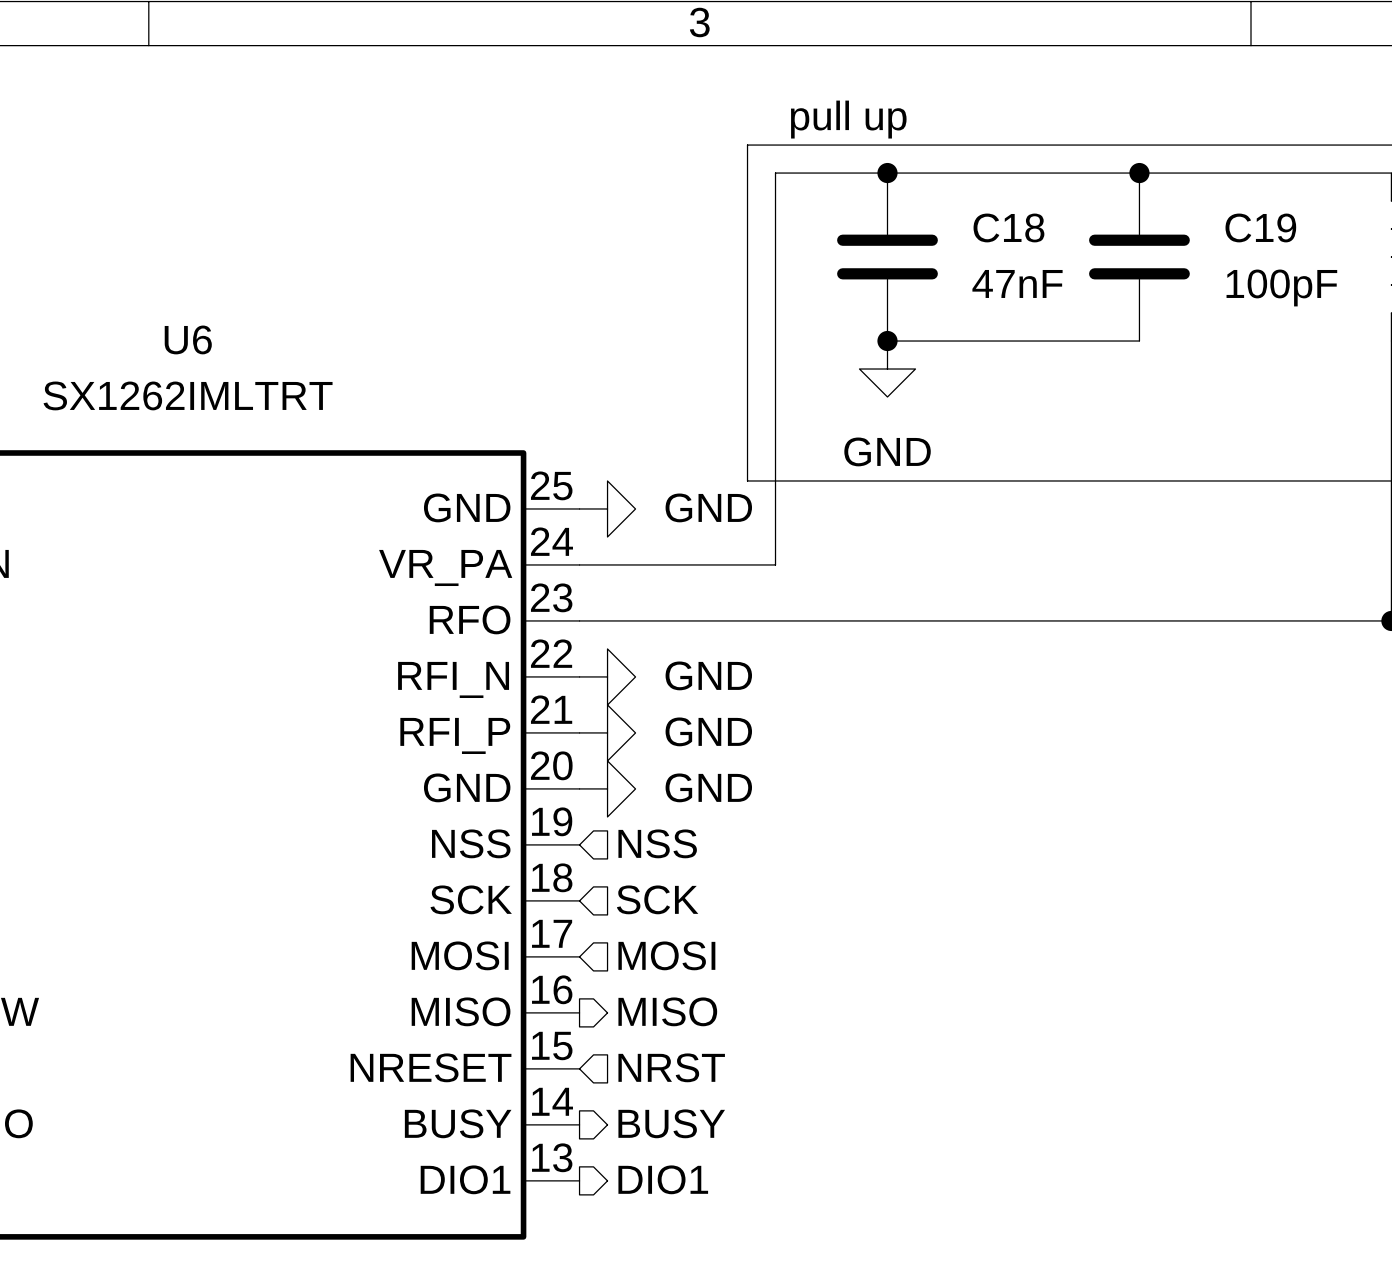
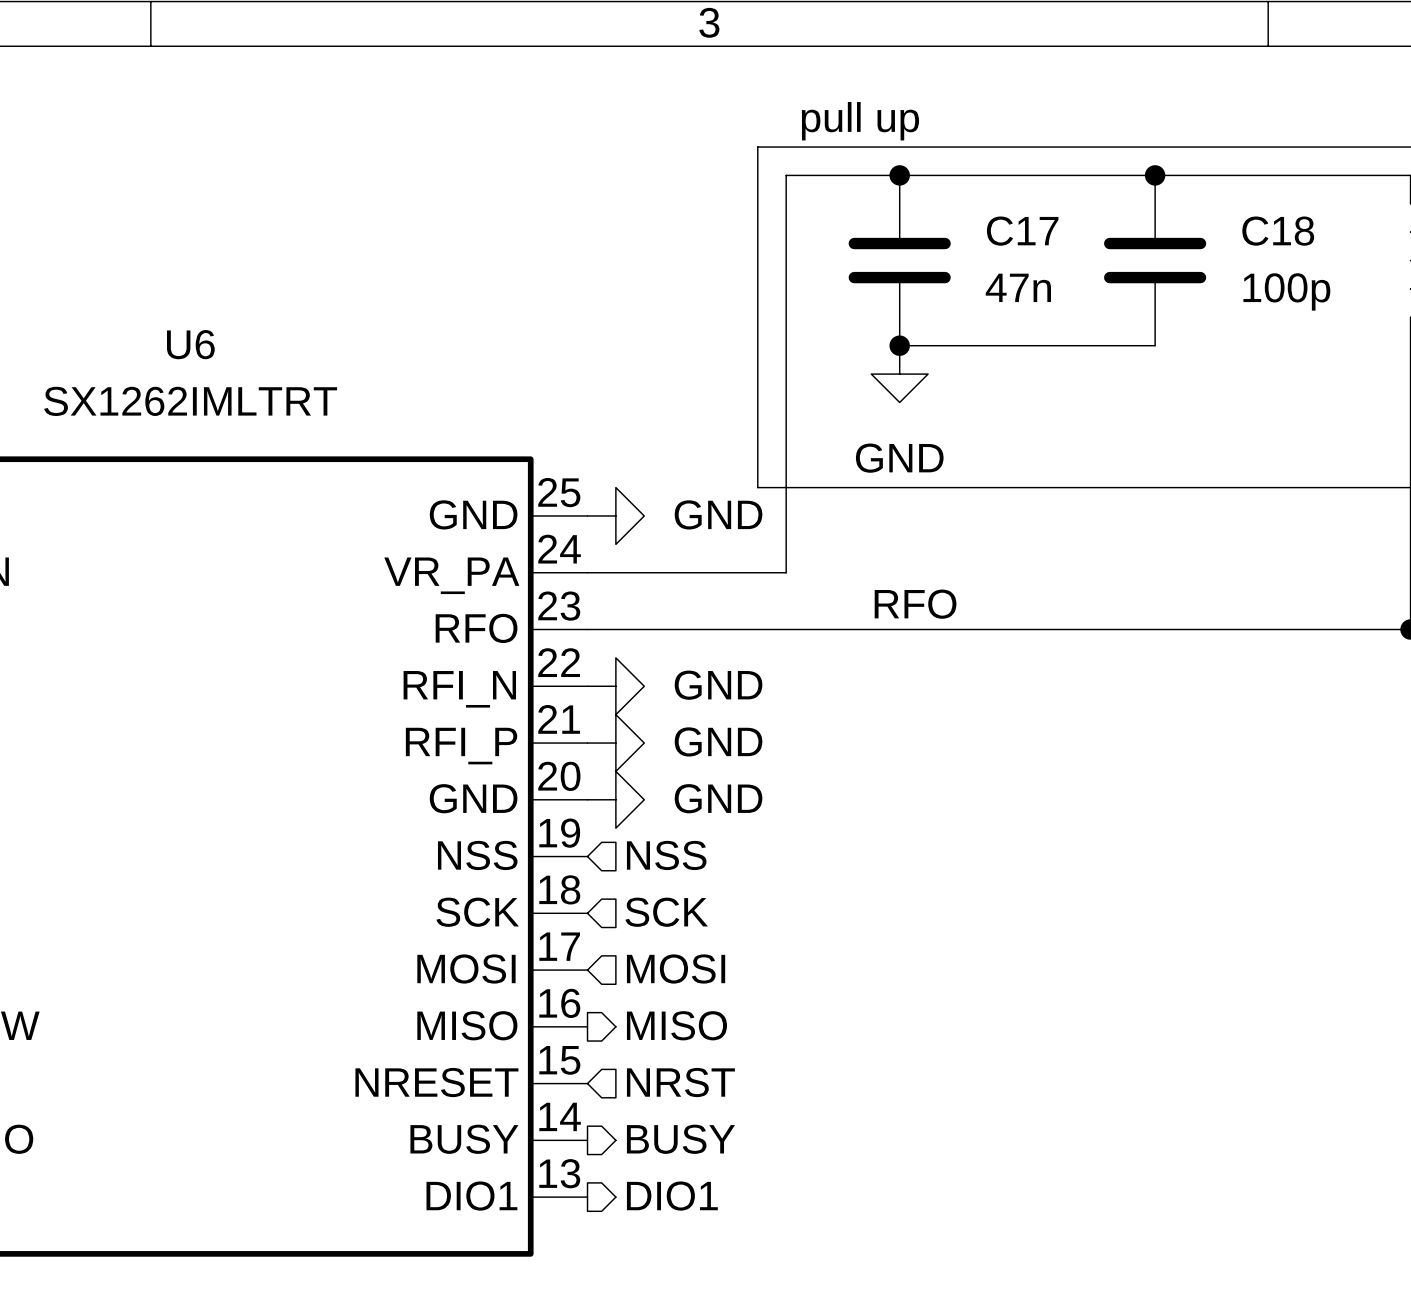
C18 name: C18 (1008, 227) -> C17 (1022, 231)
C19 name: C19 (1260, 227) -> C18 (1278, 231)
C18 value: 47nF (1017, 283) -> 47n (1018, 287)
C19 value: 100pF (1281, 287) -> 100p (1286, 291)
label: none -> RFO (915, 604)

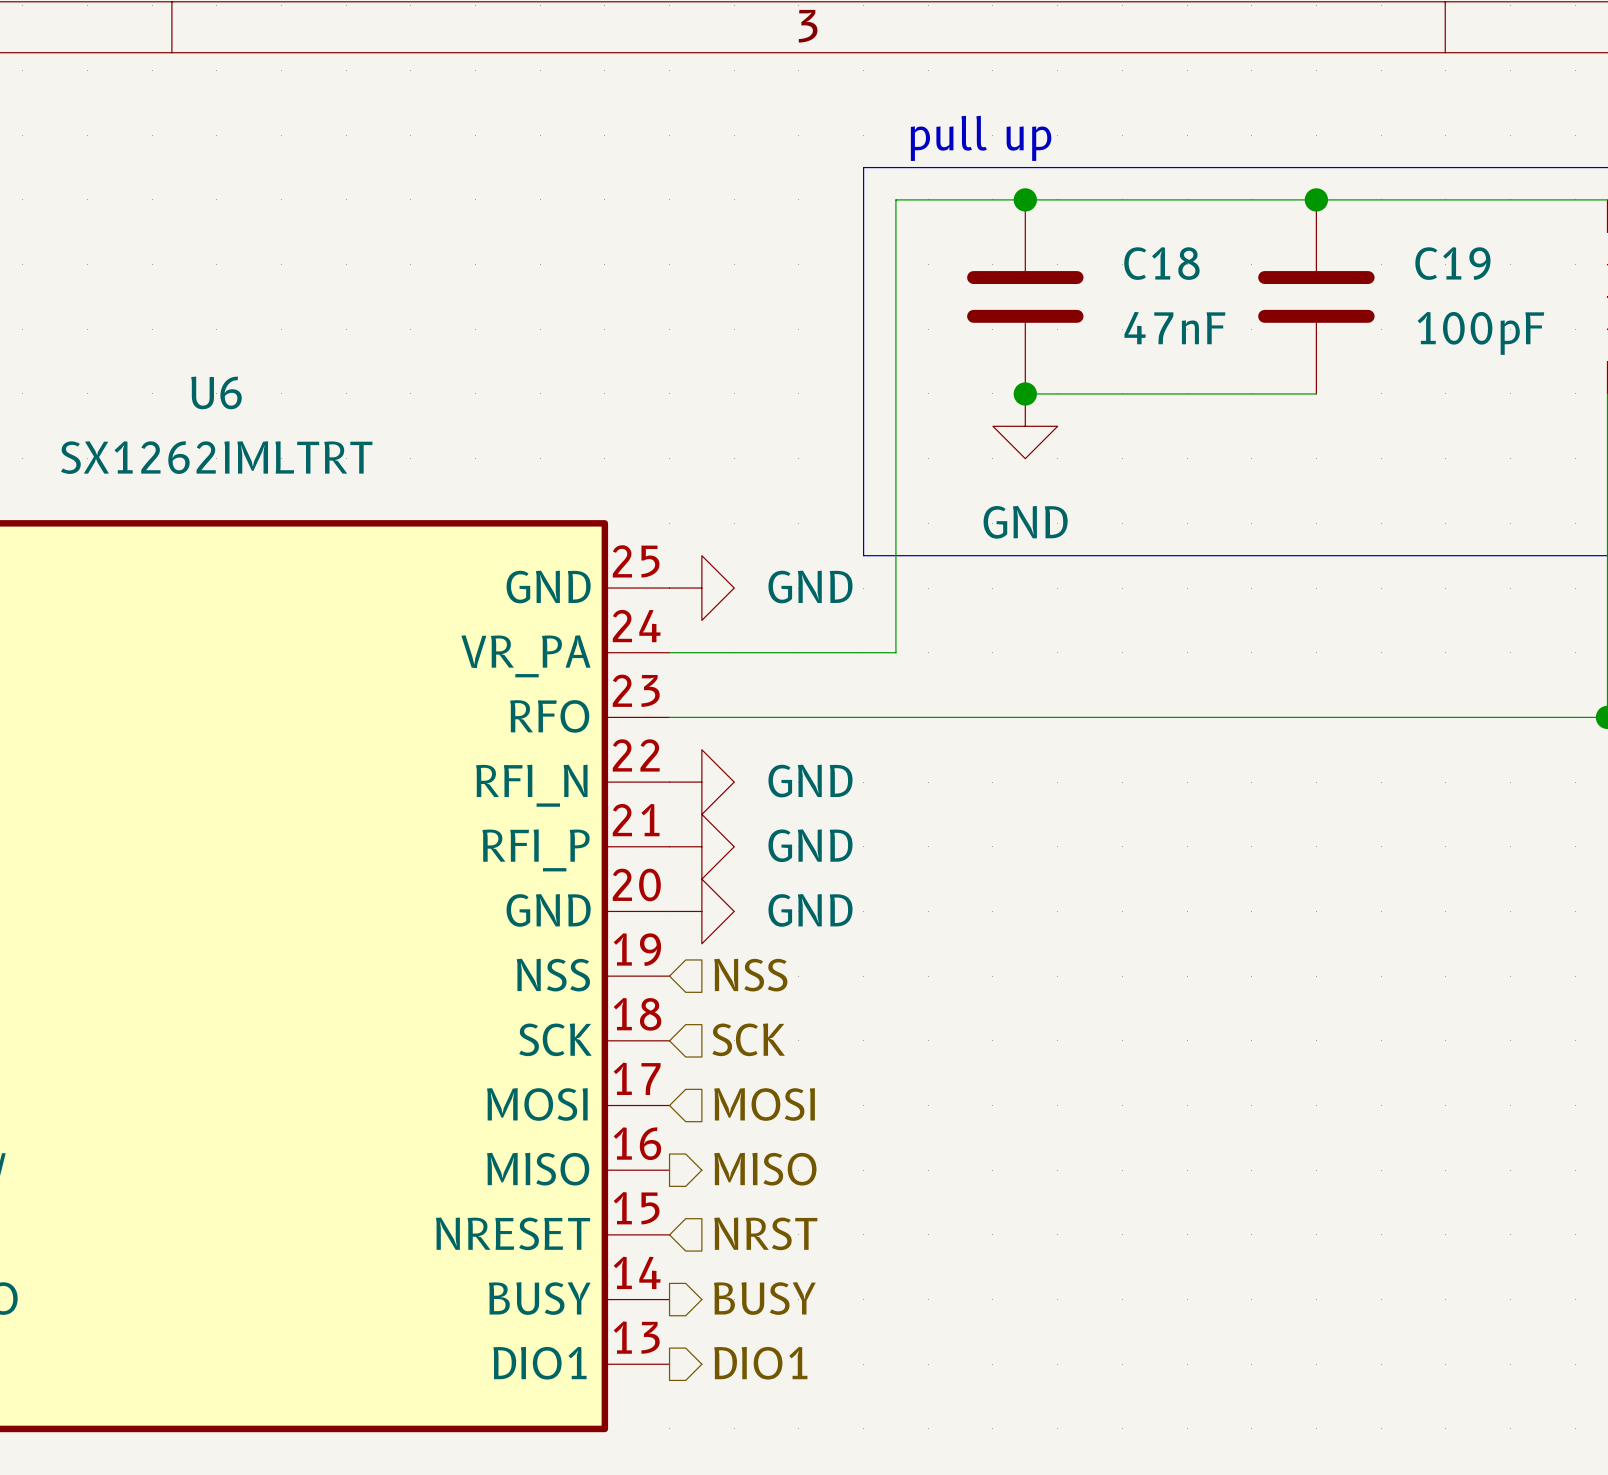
C17 name: C17 (1022, 231) -> C18 (1161, 263)
C18 name: C18 (1278, 231) -> C19 (1452, 263)
C17 value: 47n (1018, 287) -> 47nF (1174, 328)
C18 value: 100p (1286, 291) -> 100pF (1480, 333)
label: RFO (915, 604) -> none

